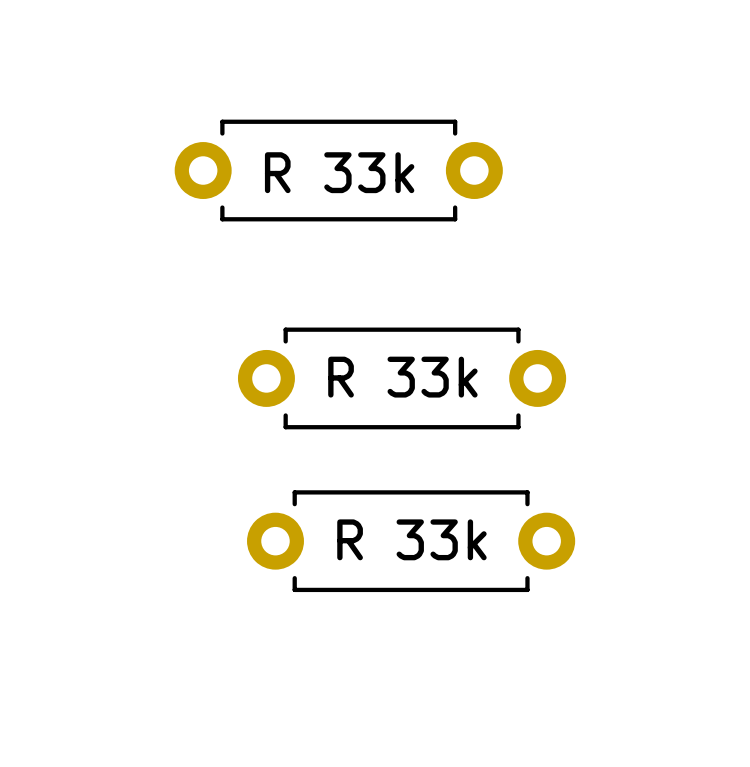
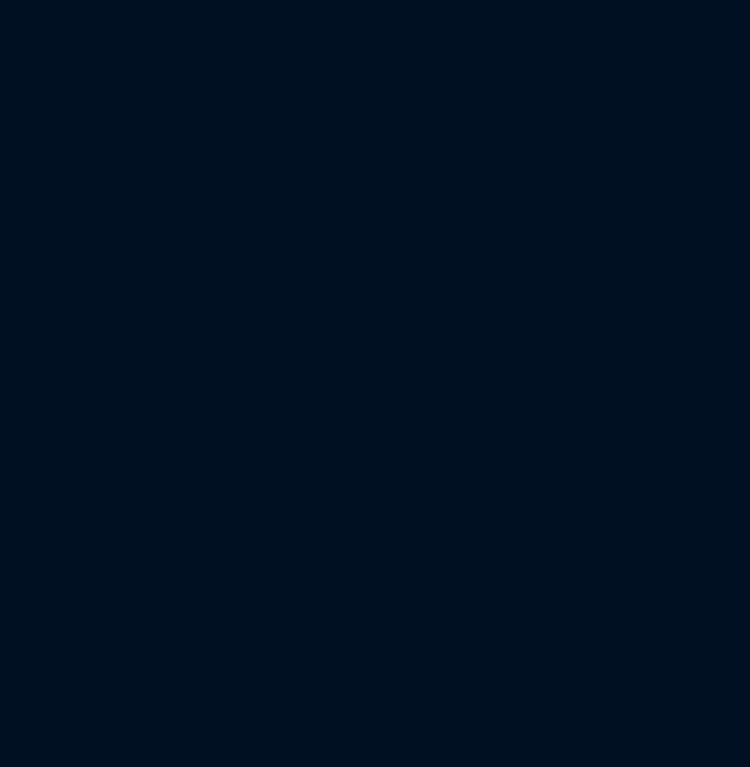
R 33k: (338, 170) -> none
R 33k: (402, 378) -> none
R 33k: (411, 541) -> none

